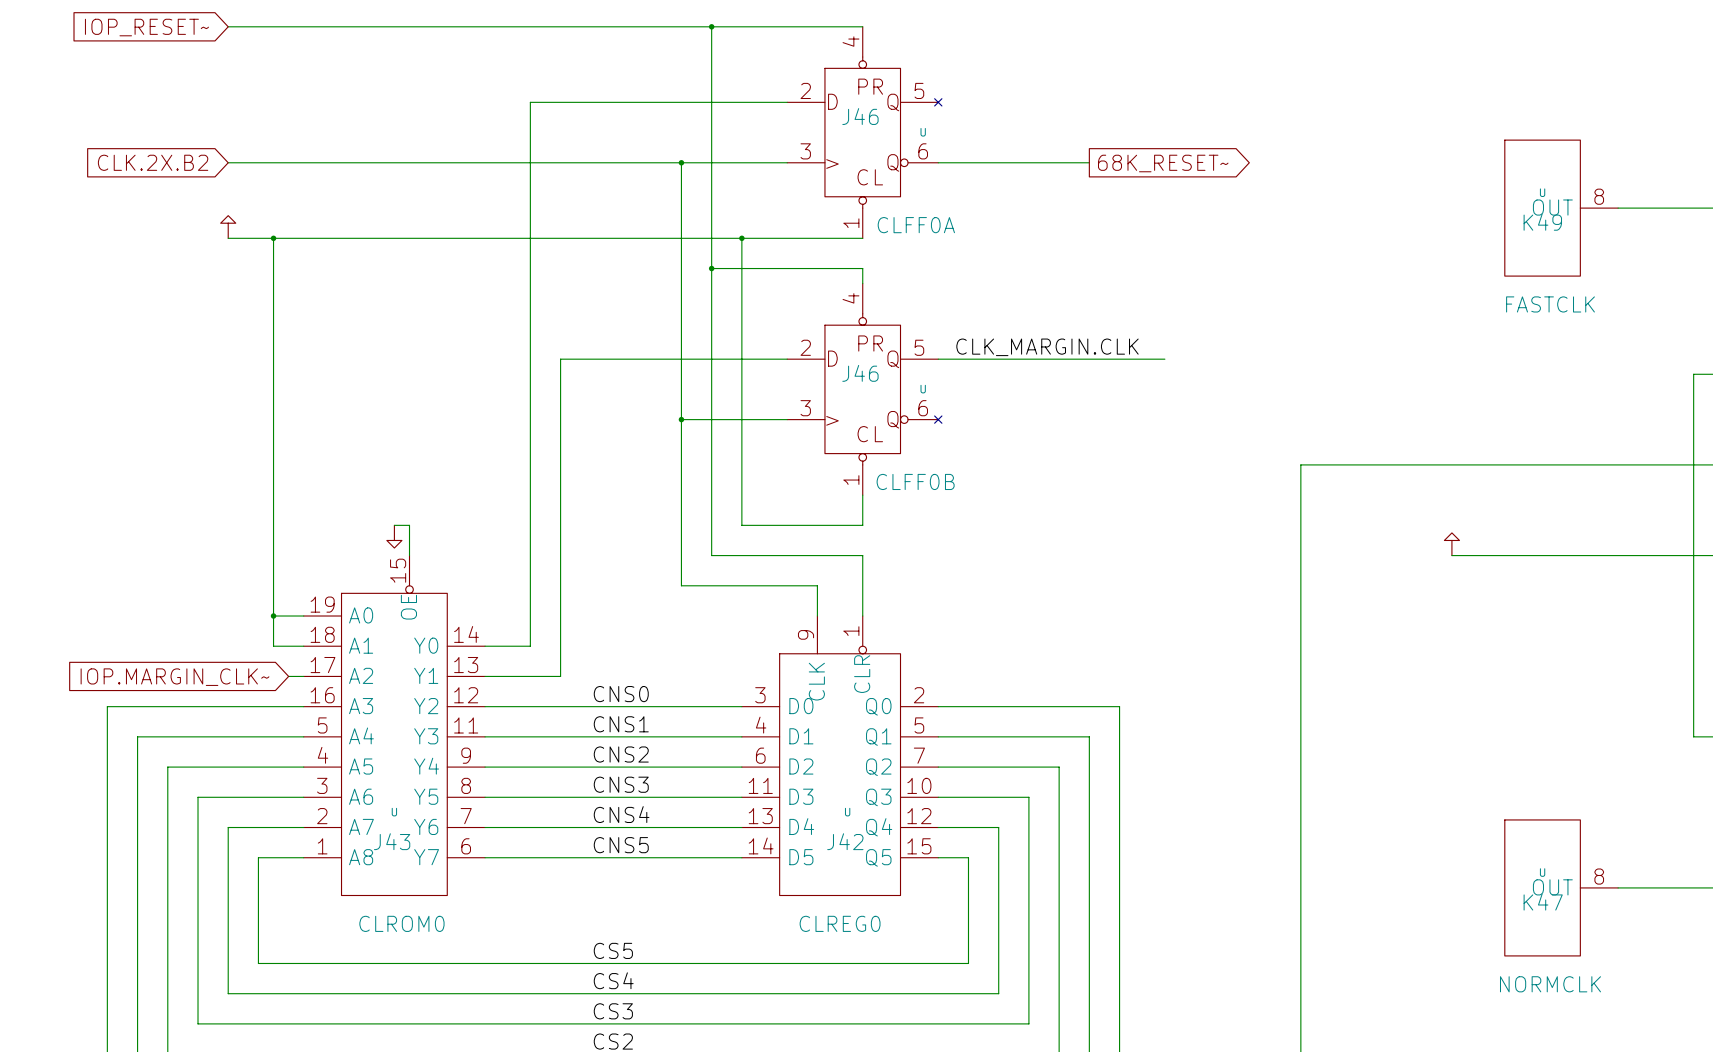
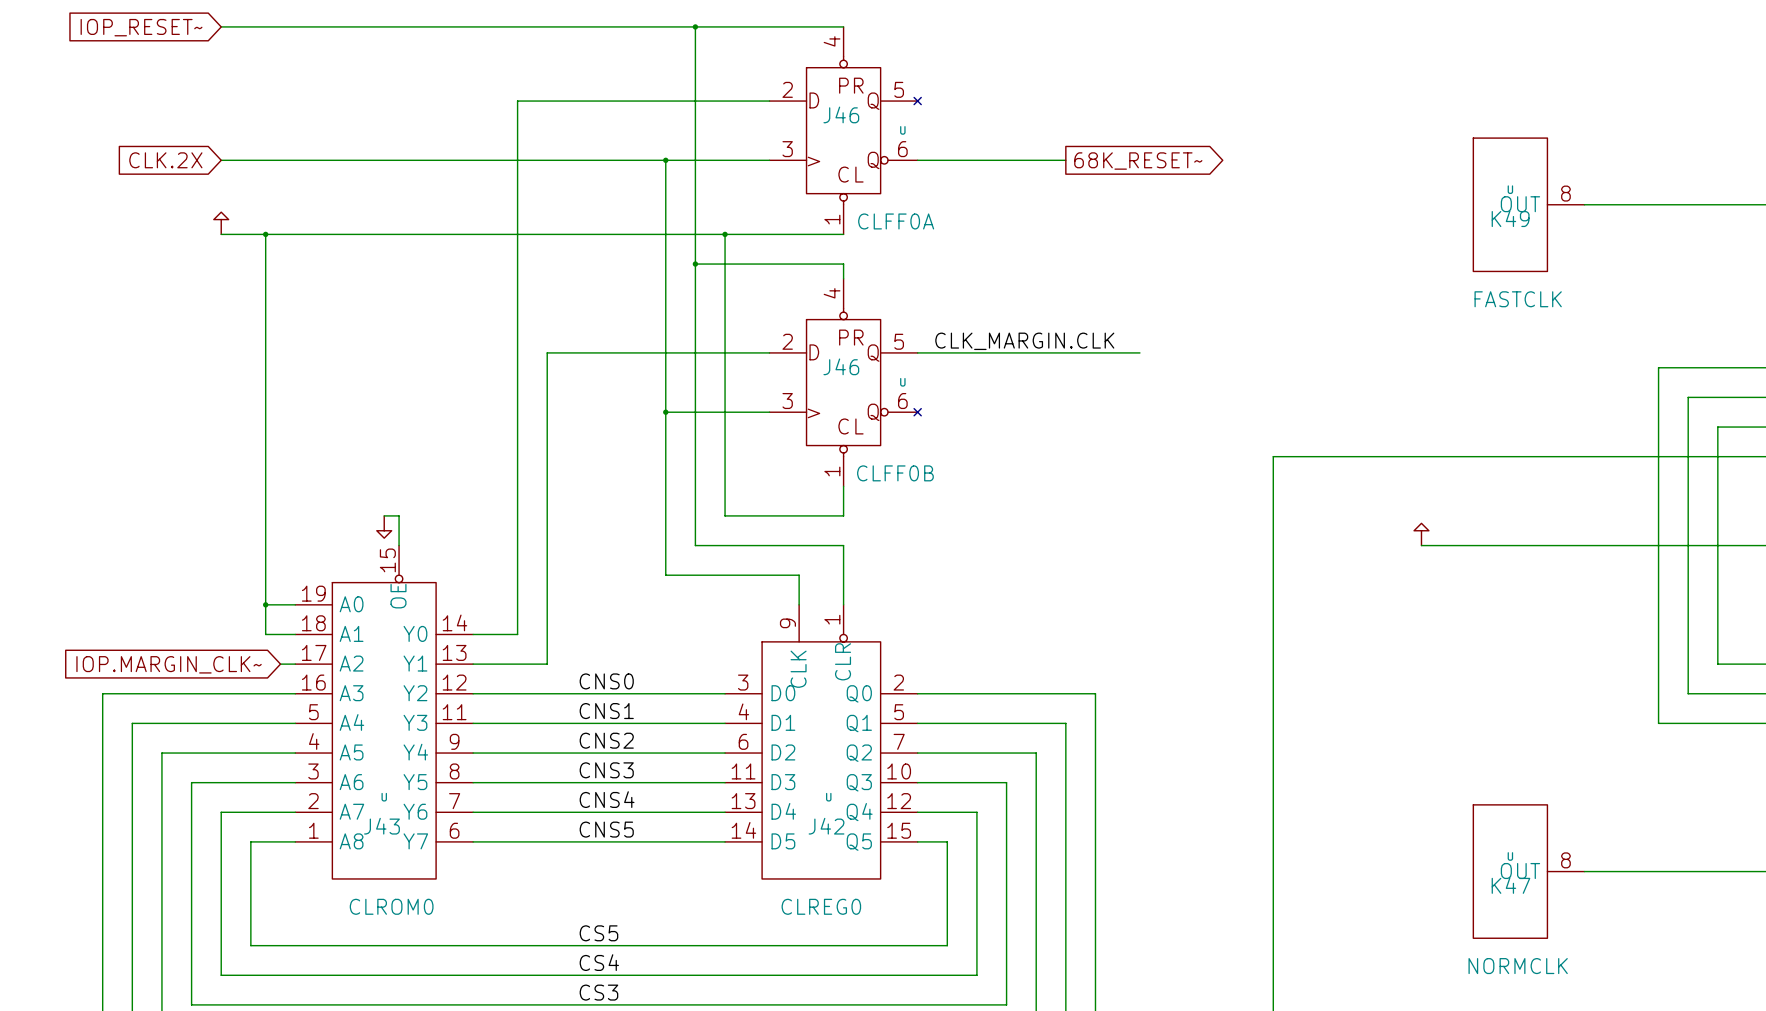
global label: CLK.2X.B2 (153, 162) -> CLK.2X (165, 160)

